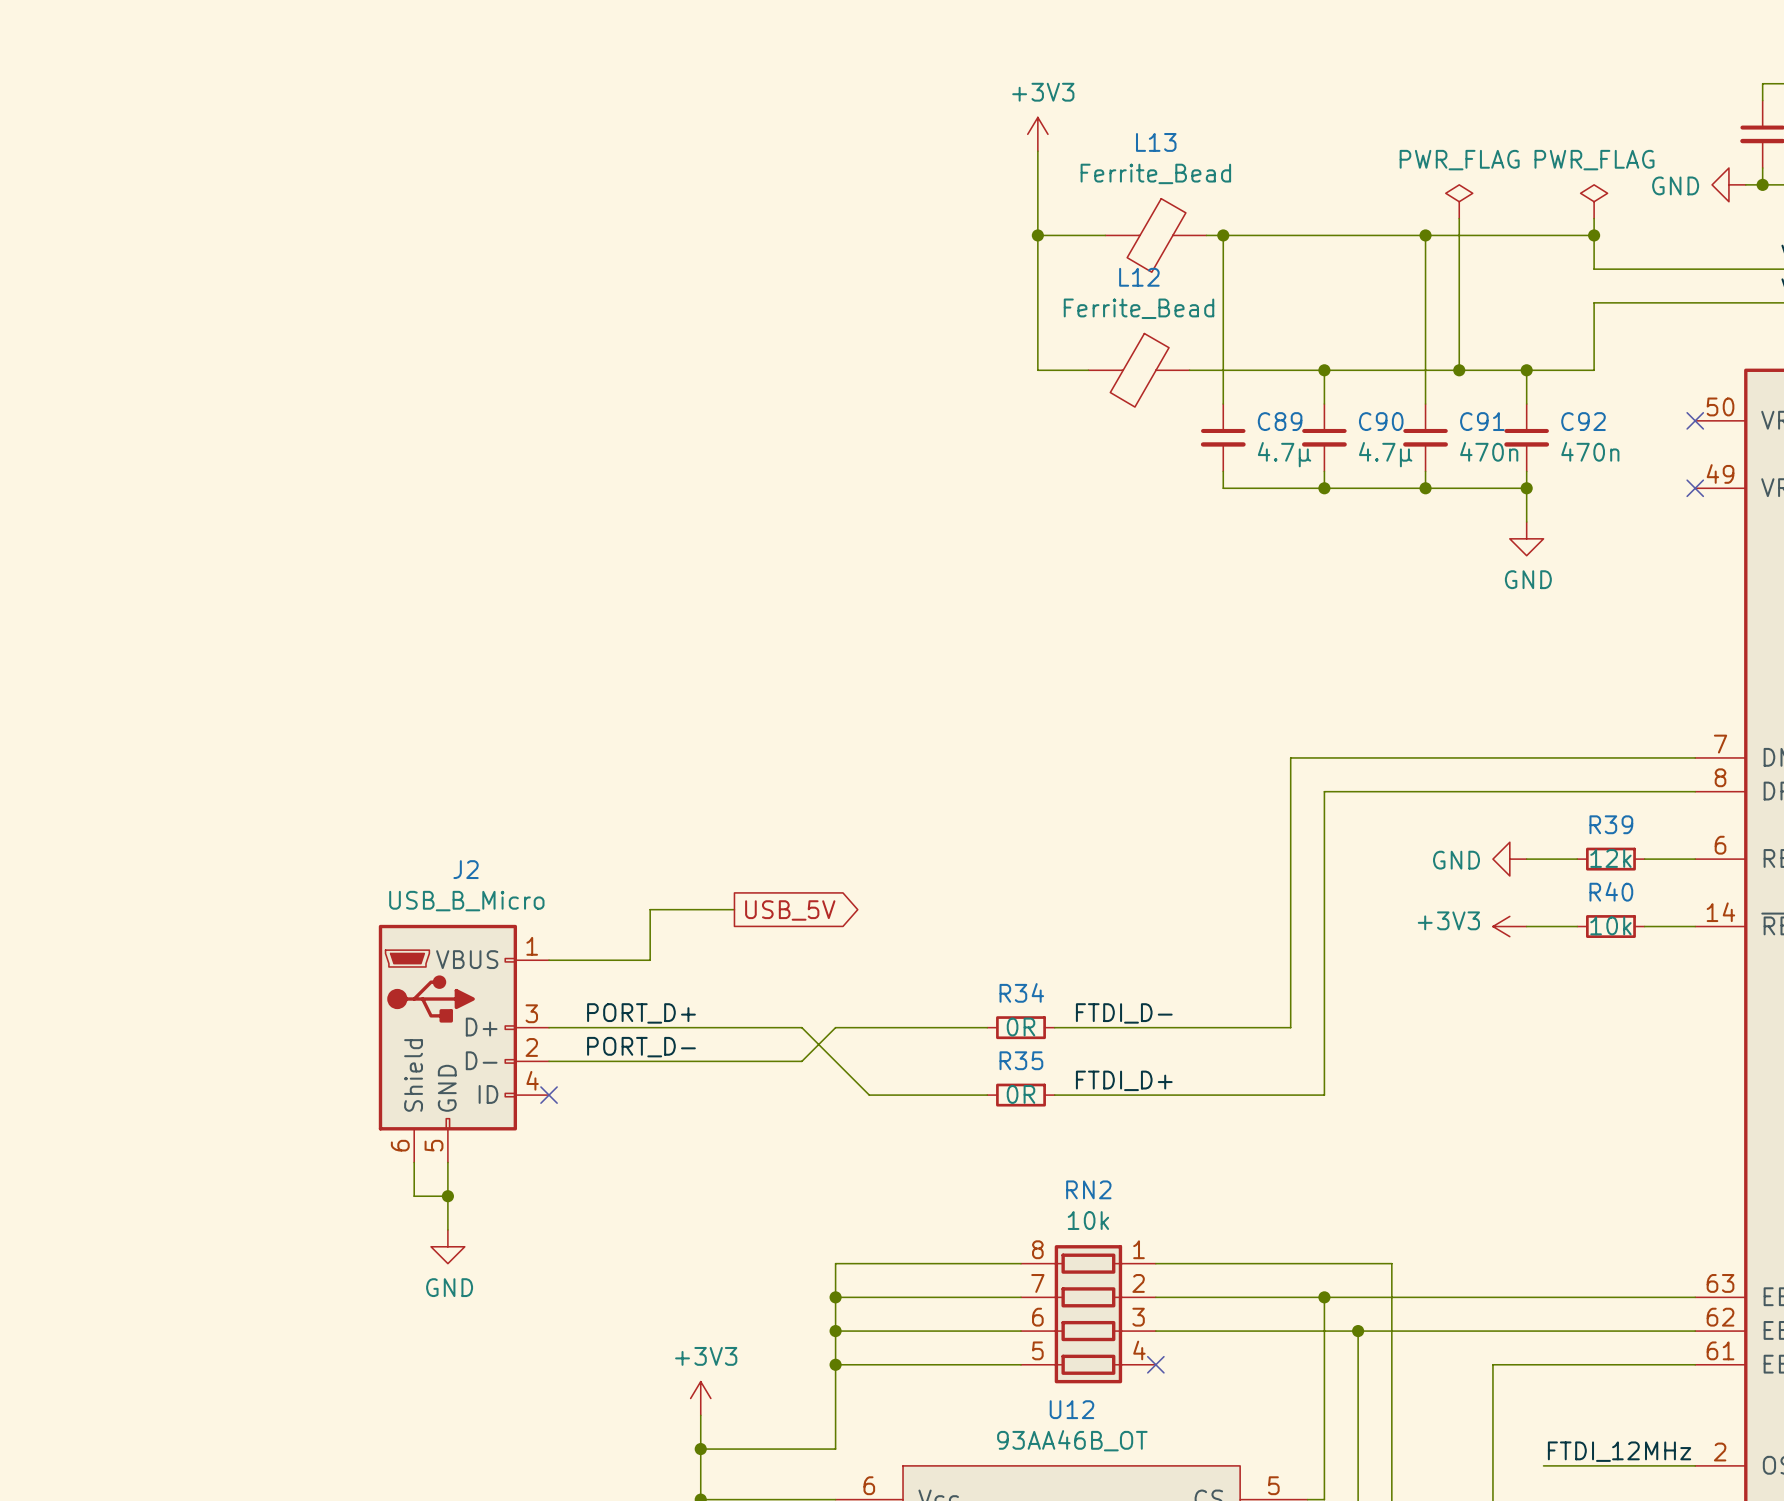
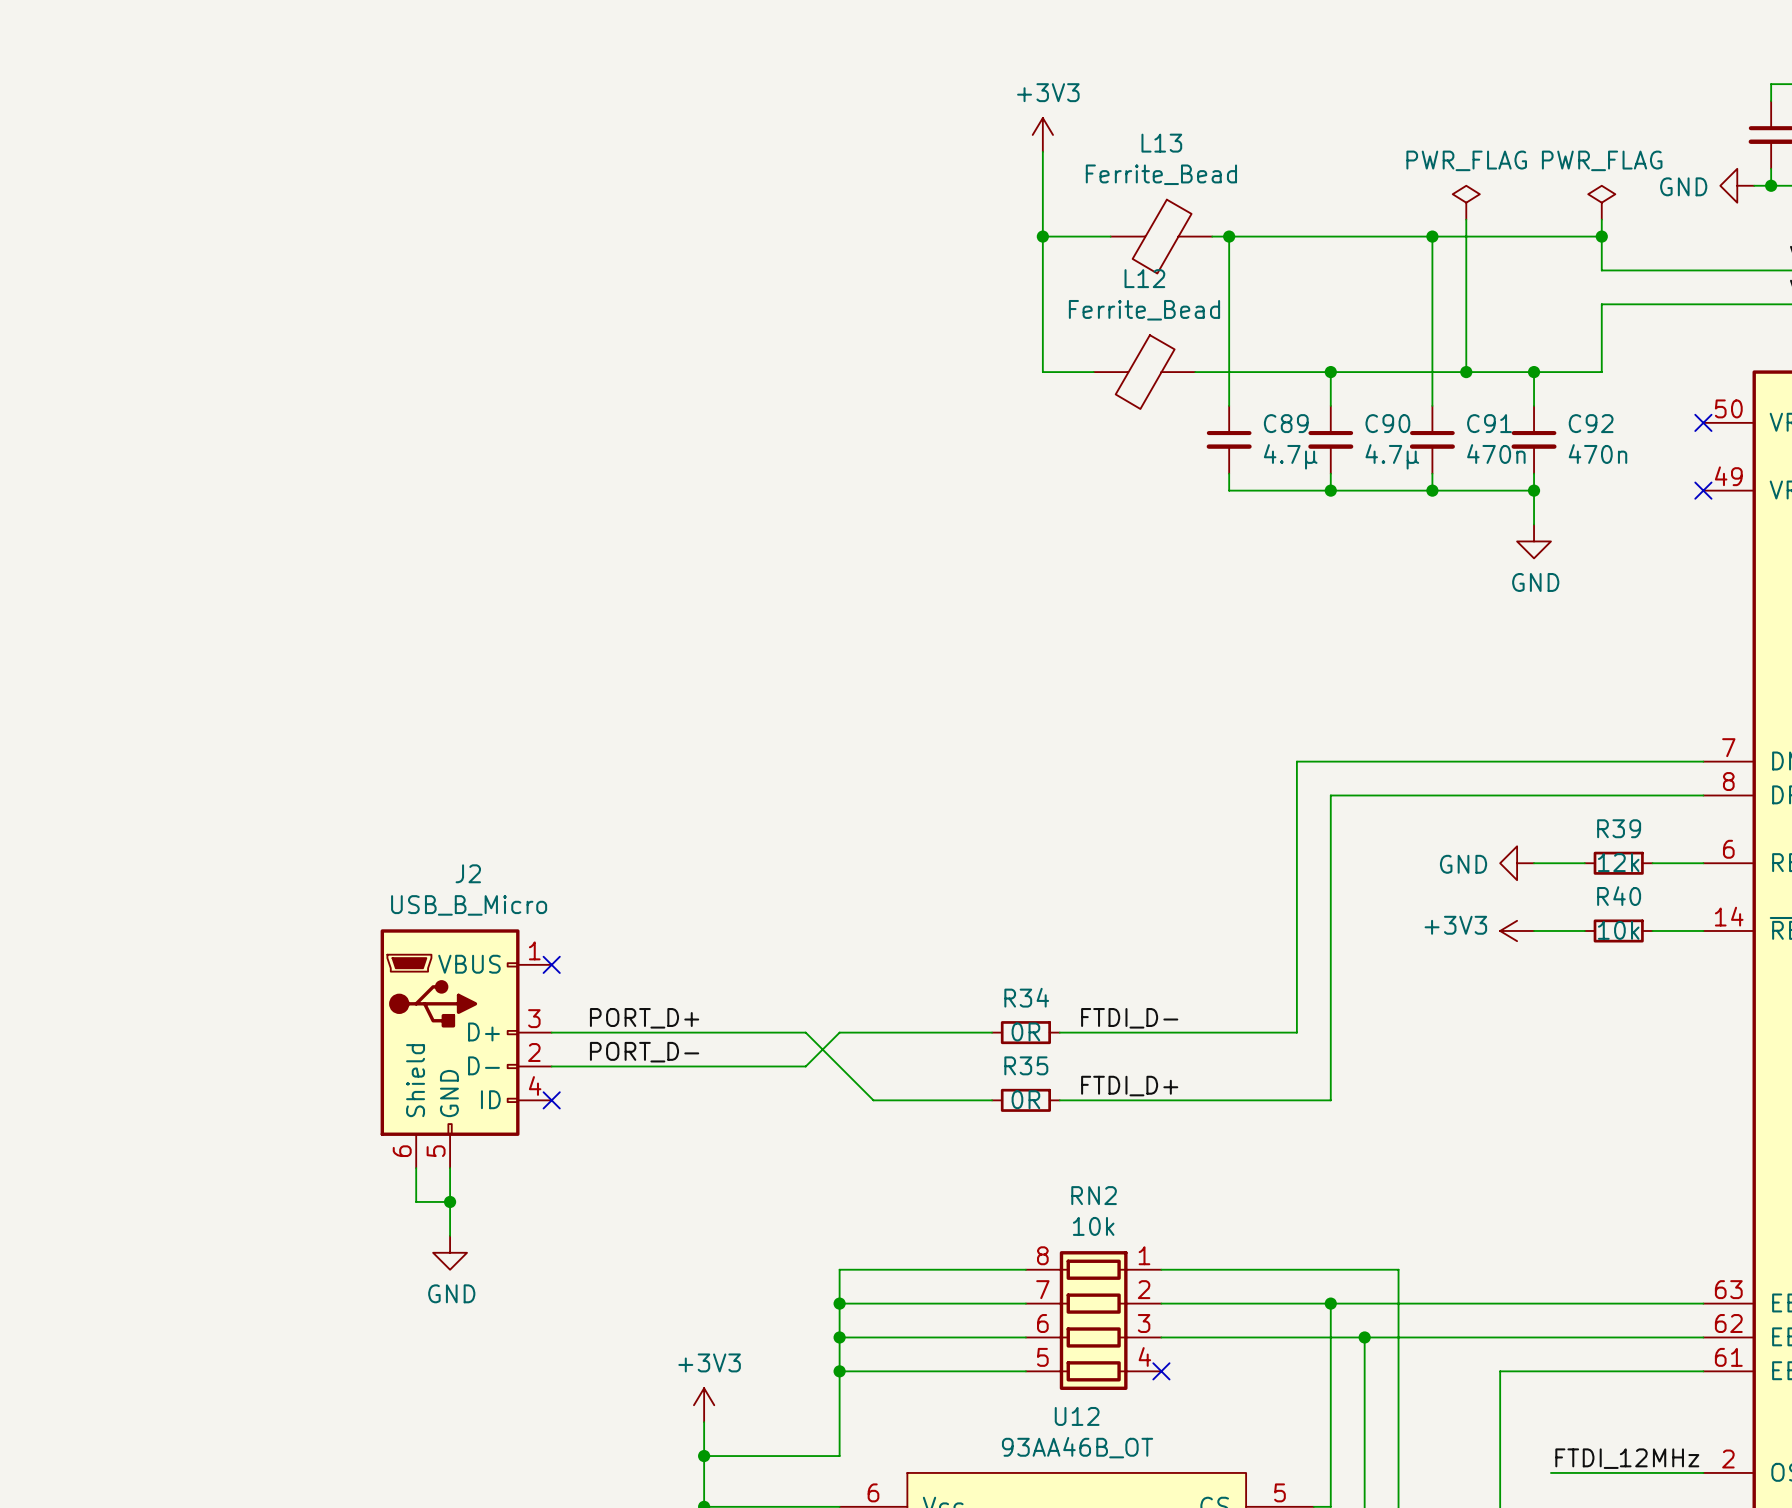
wire: (734, 909) (650, 909) (650, 960) (549, 960) -> none
global label: USB_5V (790, 910) -> none
no-connect mark: none -> (551, 964)

